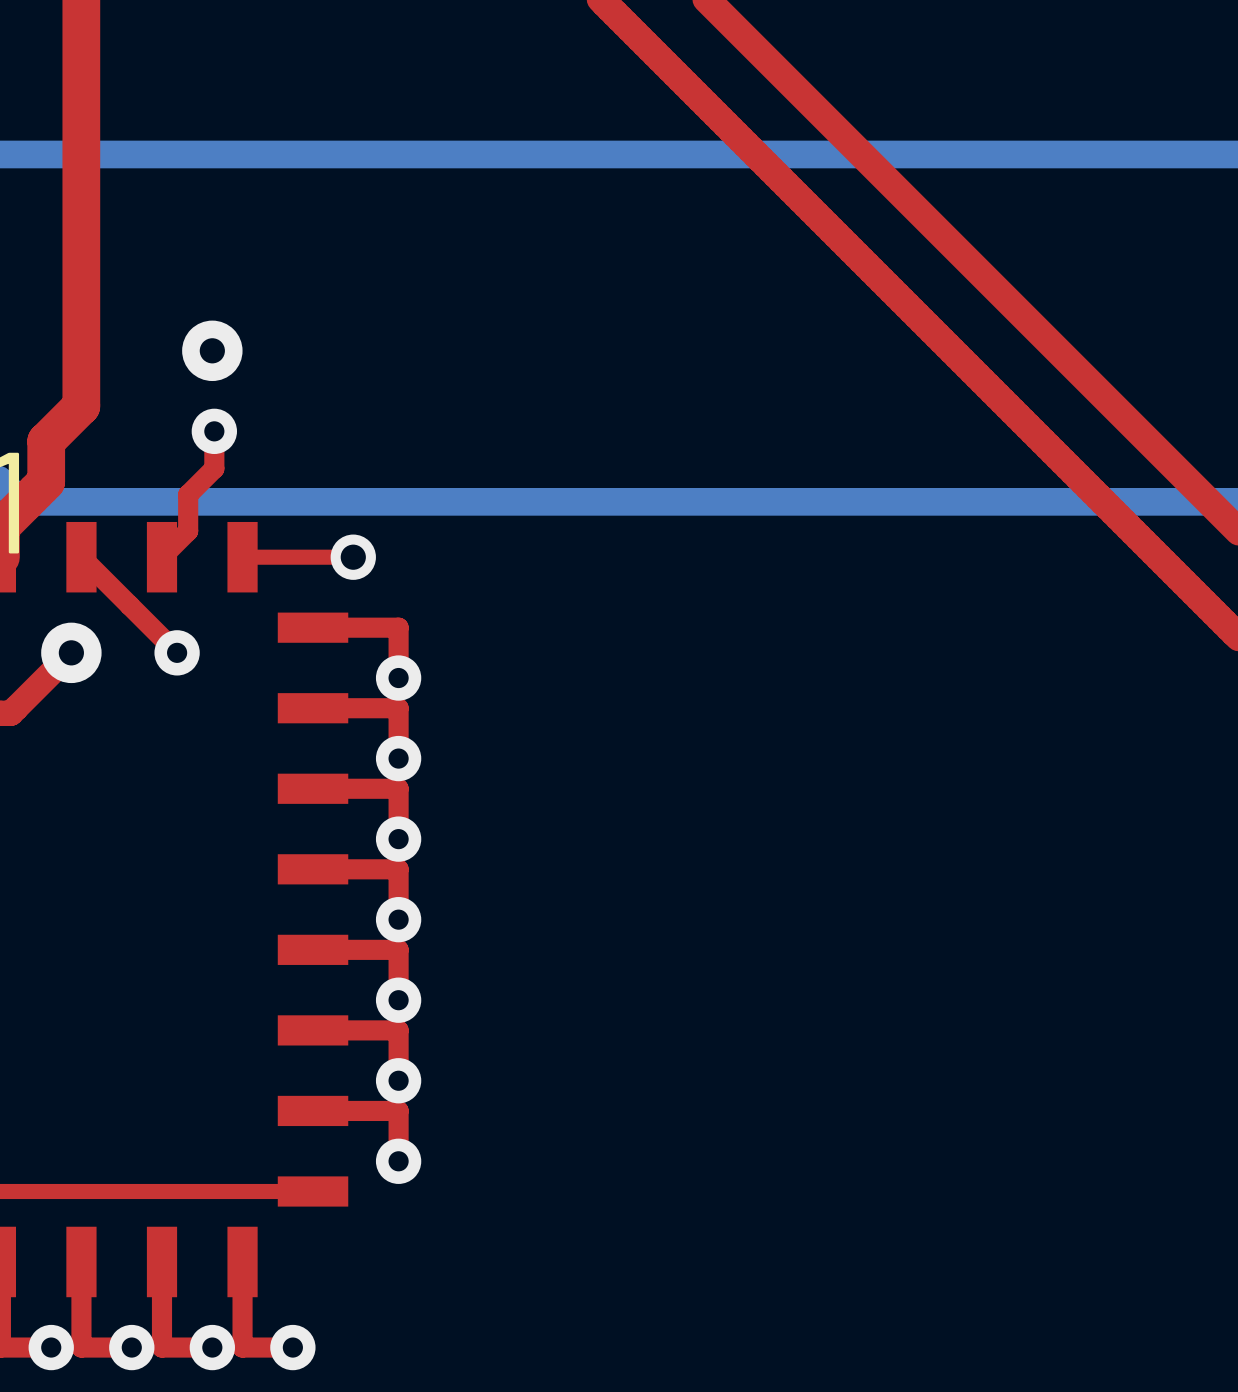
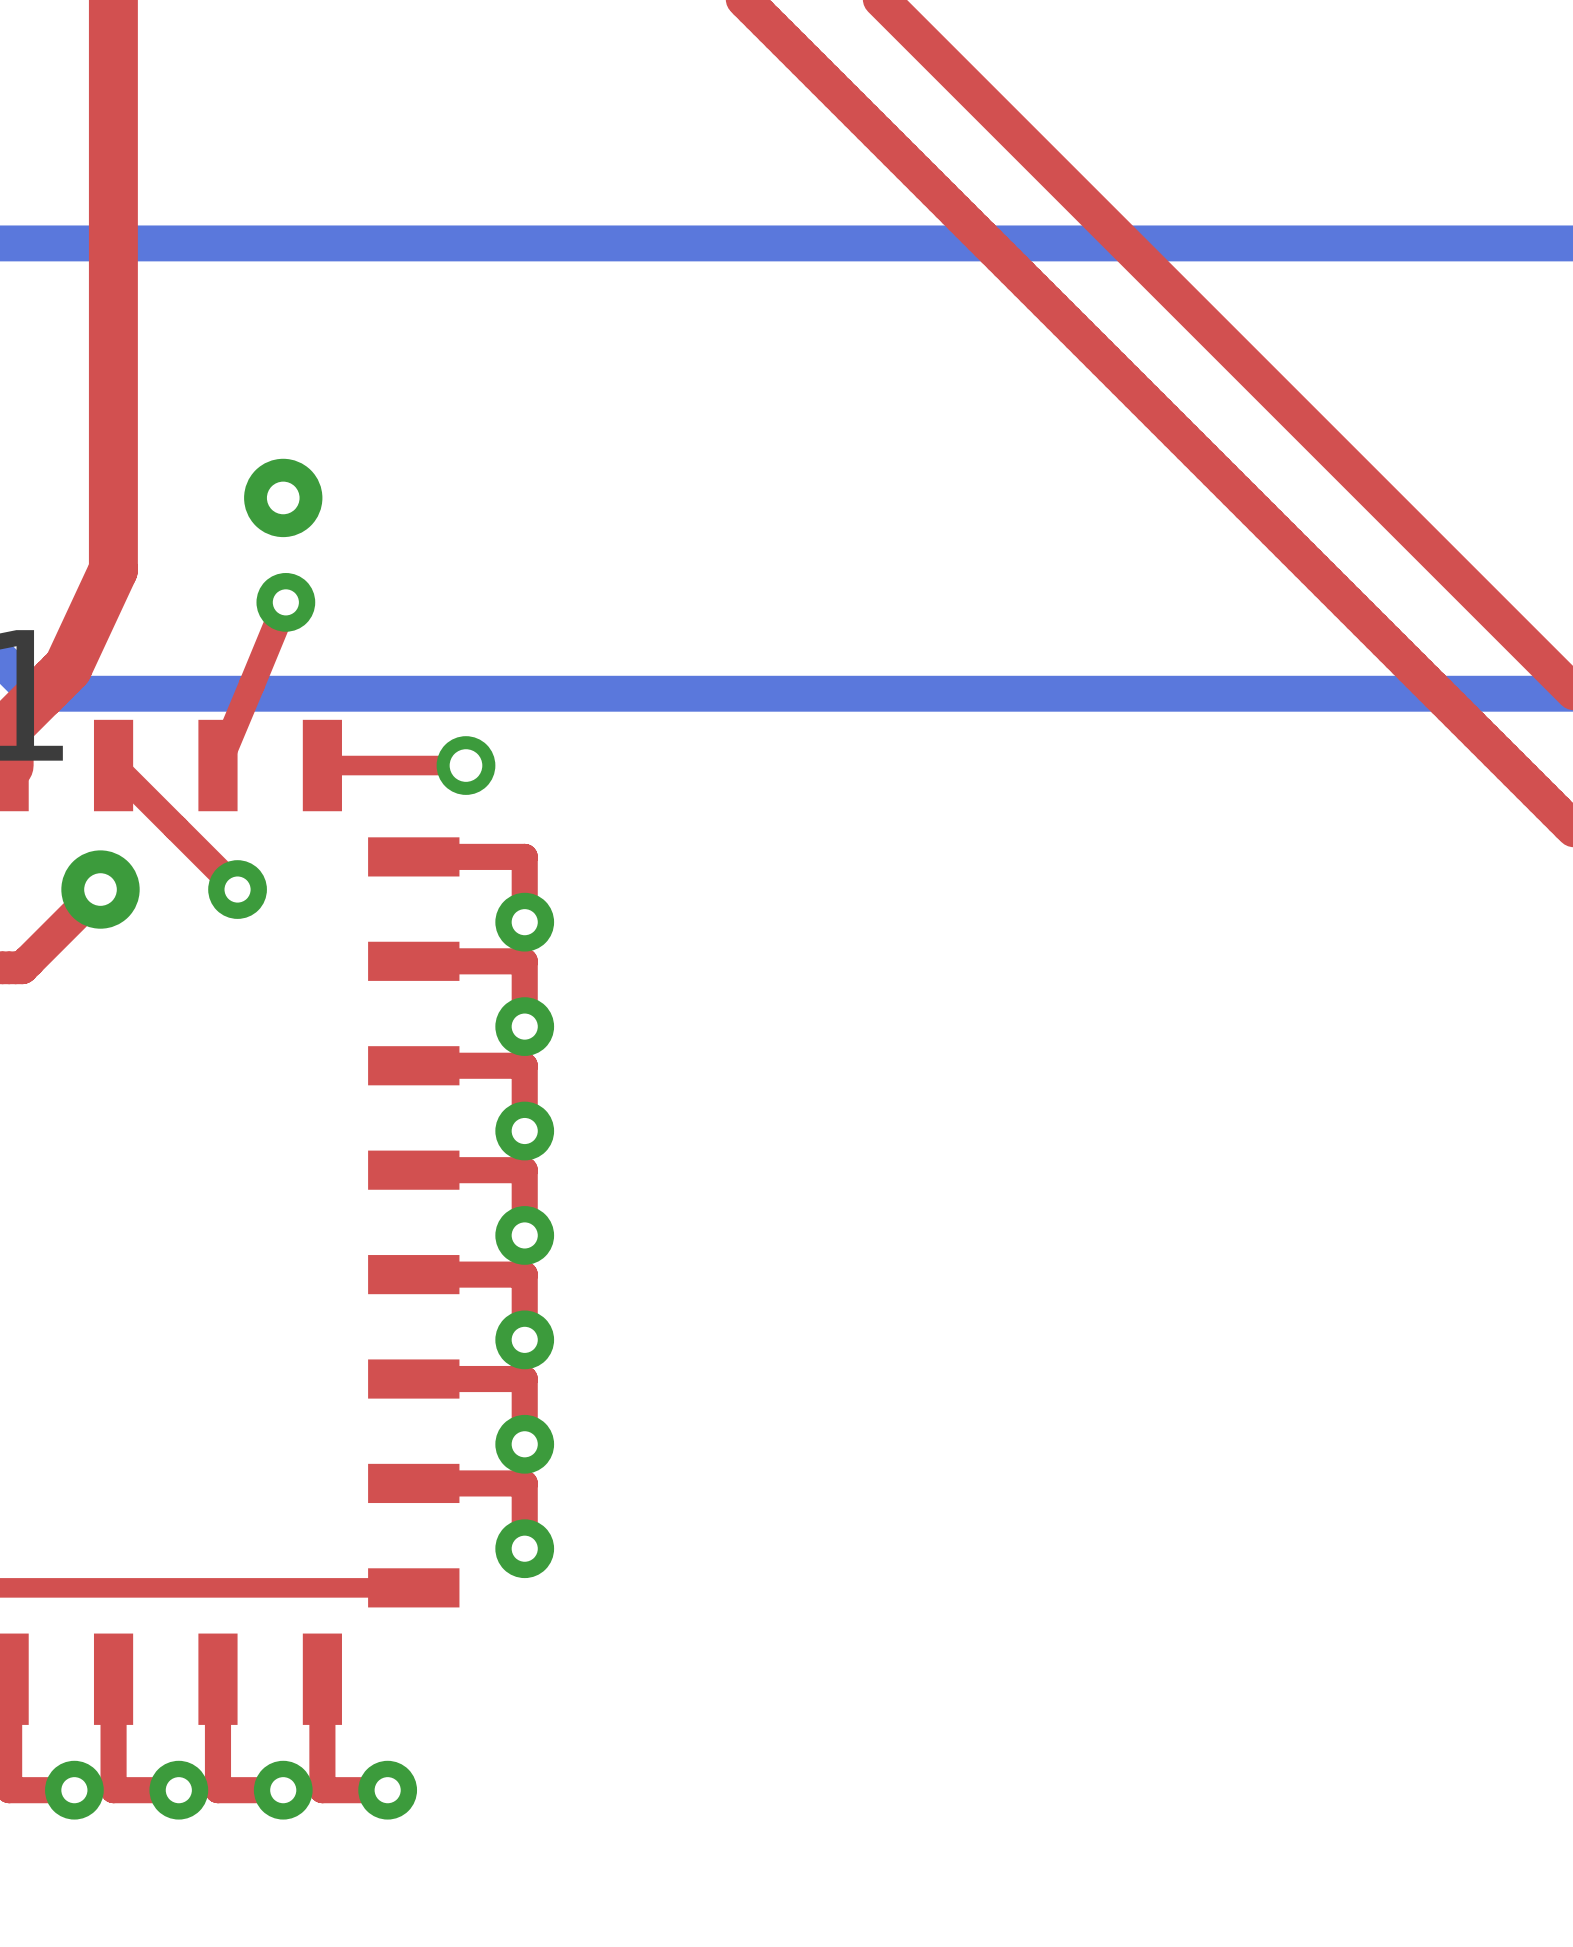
top track: (81, 406) (46, 441) (46, 481) -> (113, 569) (67, 667)
top track: (214, 431) (214, 468) (188, 494) (188, 531) (161, 557) -> (285, 602) (217, 765)

